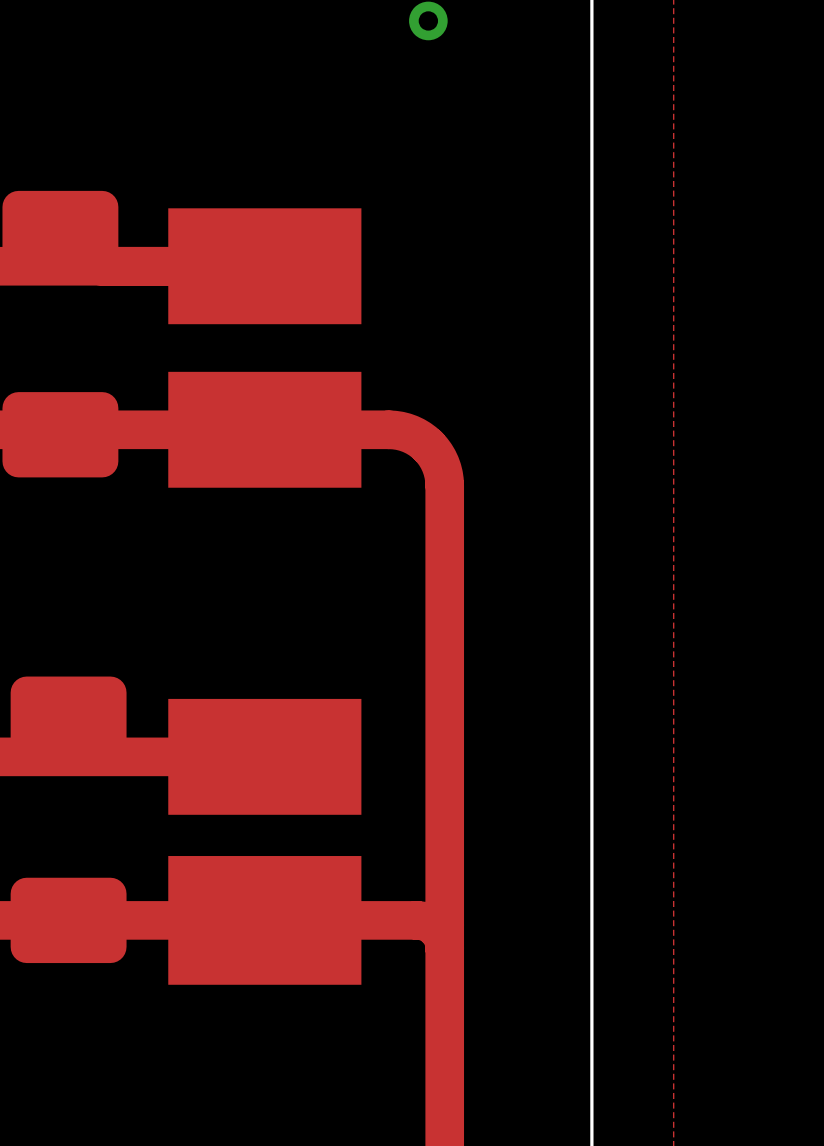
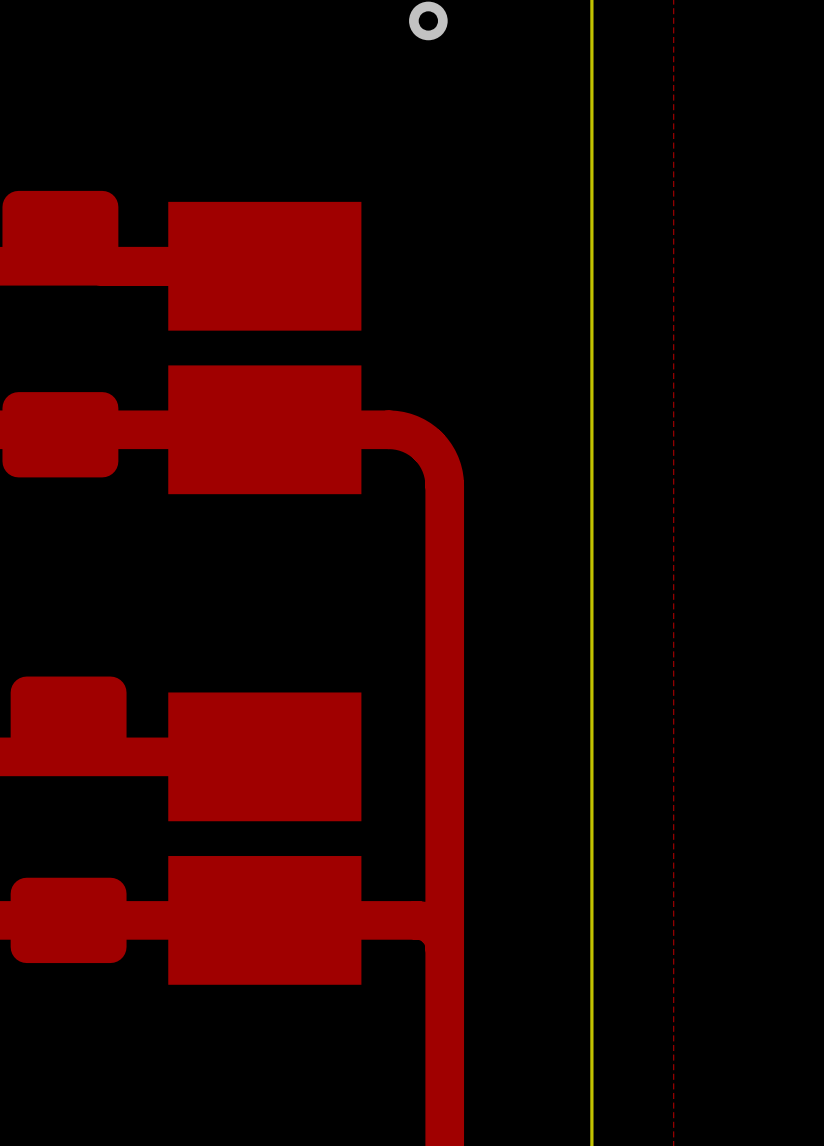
part footprint: [168, 208, 362, 488] -> [168, 201, 362, 495]
part footprint: [168, 698, 362, 985] -> [168, 692, 362, 985]

